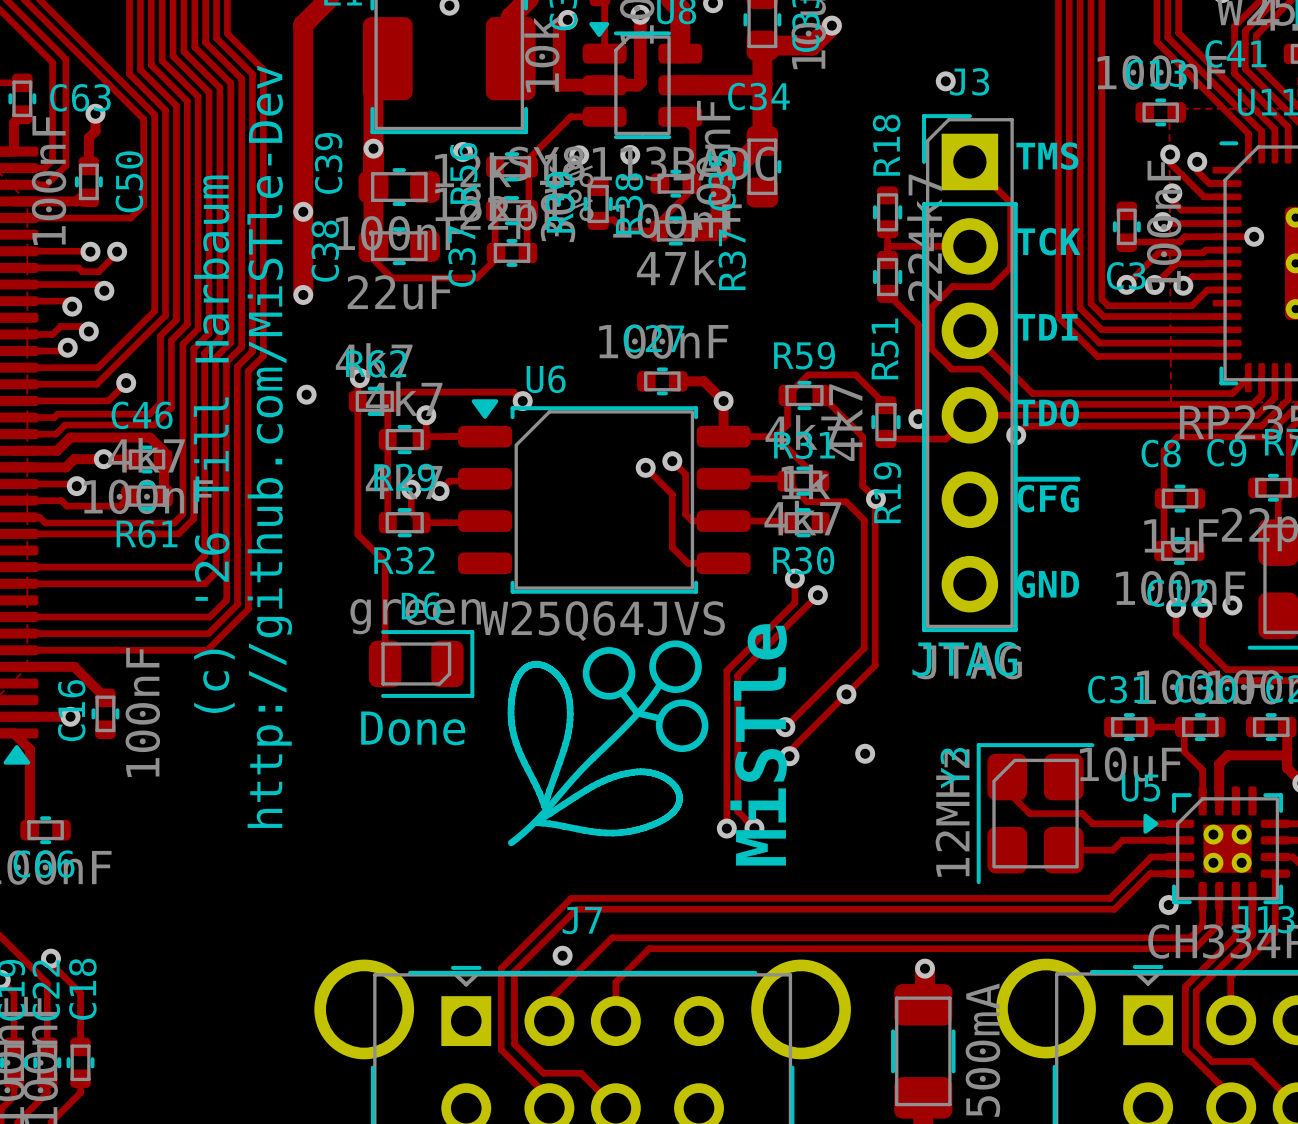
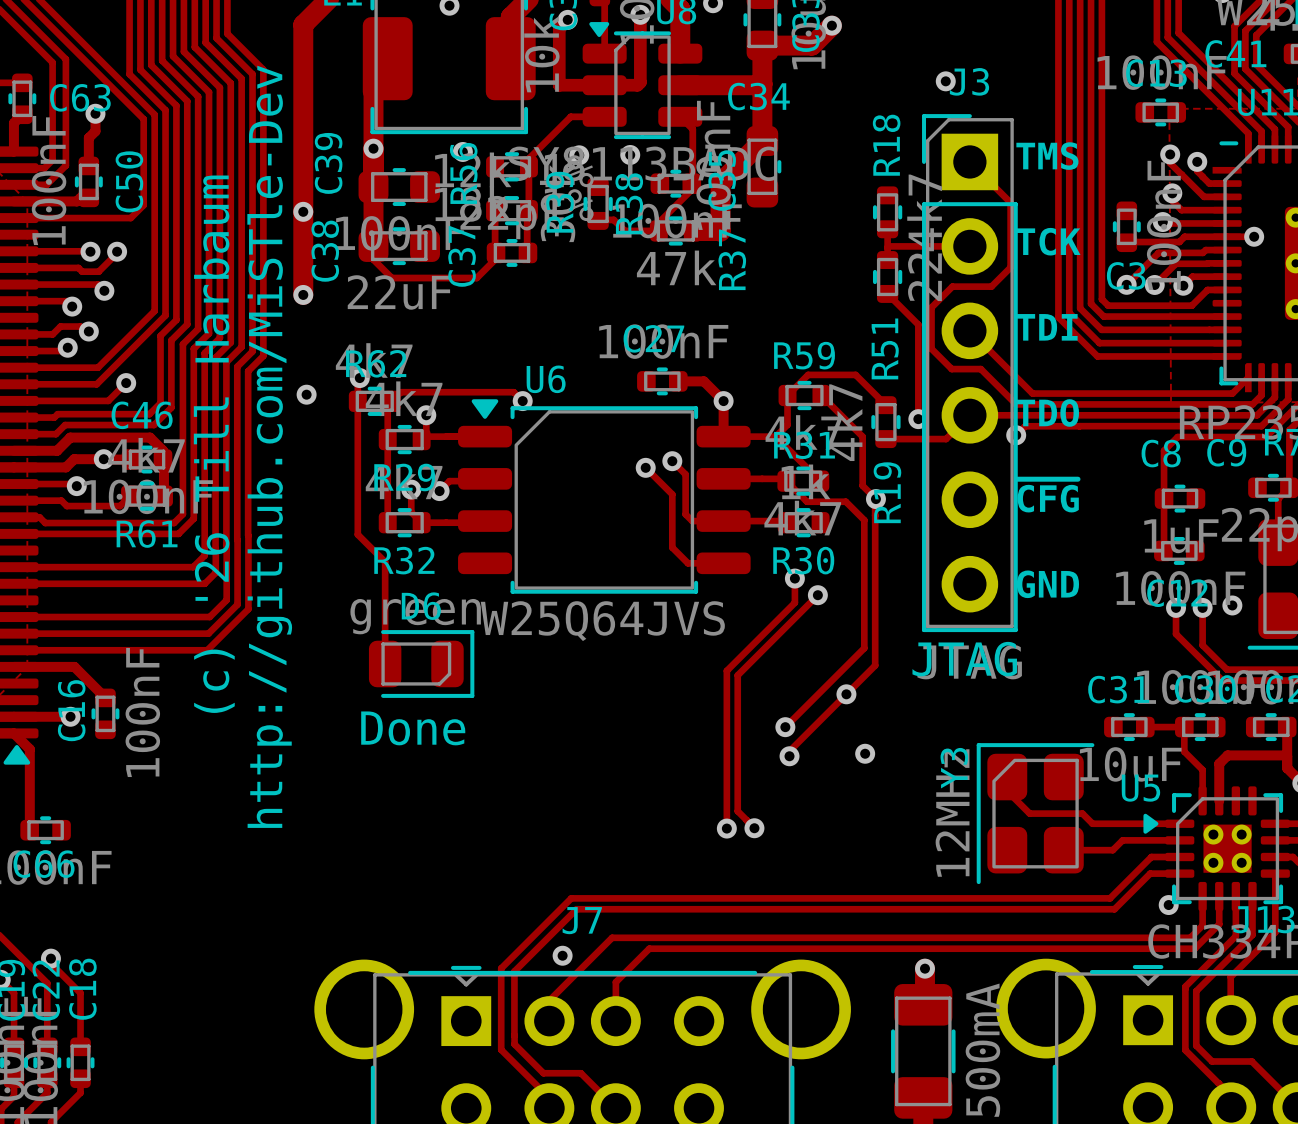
drawing: [582, 640, 709, 753] -> none
line: (535, 664) (524, 668) (516, 678) (512, 694) (511, 716) (518, 749) (544, 806) (565, 743) (569, 725) (570, 707) (567, 691) (559, 677) (546, 666) (535, 664) -> none
line: (659, 685) (634, 717) (581, 769) (533, 823) (511, 842) -> none
line: (621, 692) (637, 713) (660, 718) -> none
text: MiSTle (758, 744) -> none
line: (640, 771) (620, 774) (597, 783) (535, 822) (613, 833) (637, 829) (659, 821) (676, 808) (679, 801) (678, 792) (673, 784) (664, 777) (653, 773) (640, 771) -> none

